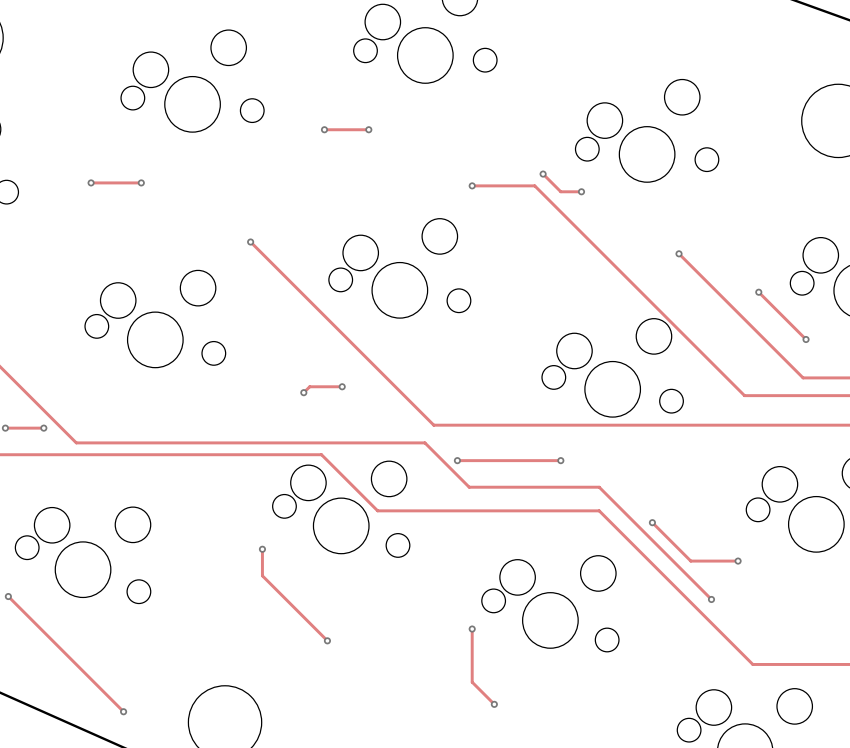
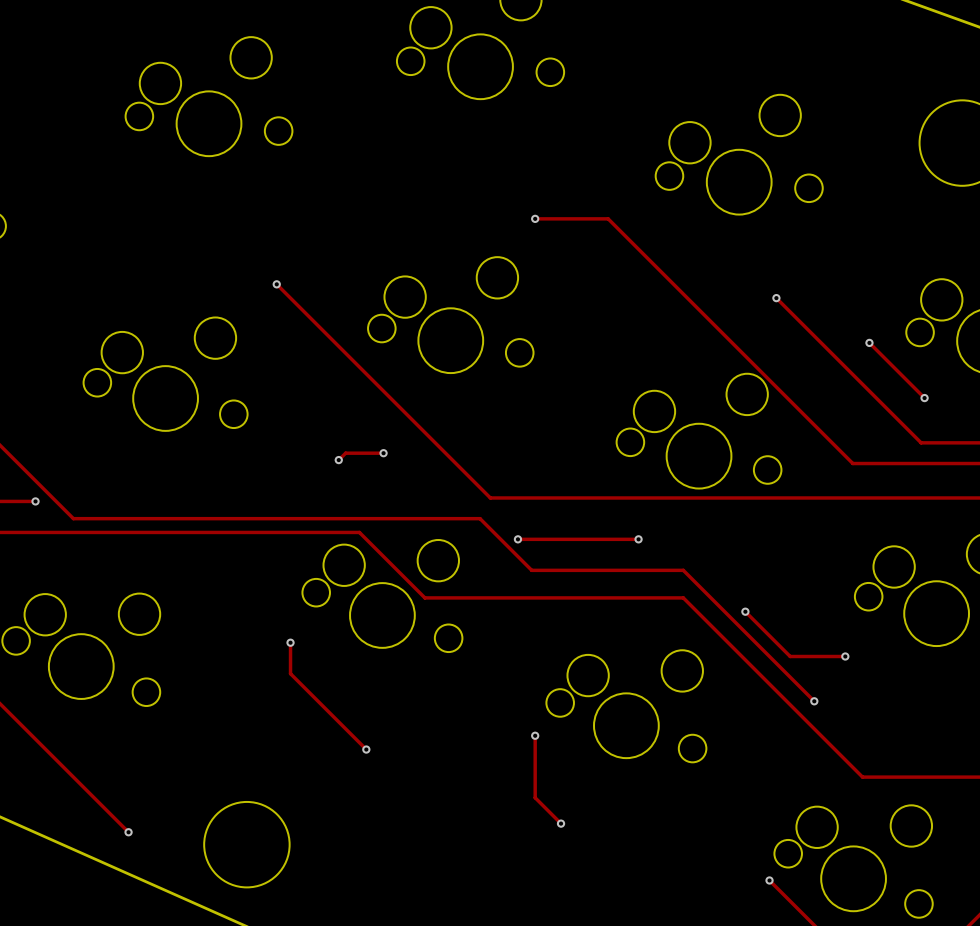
track: (324, 129) (368, 129) -> none
via: (324, 129) -> none
via: (368, 129) -> none
track: (543, 174) (560, 191) (581, 191) -> none
via: (543, 174) -> none
track: (91, 182) (141, 182) -> none
via: (91, 182) -> none
via: (141, 182) -> none
via: (581, 191) -> none

